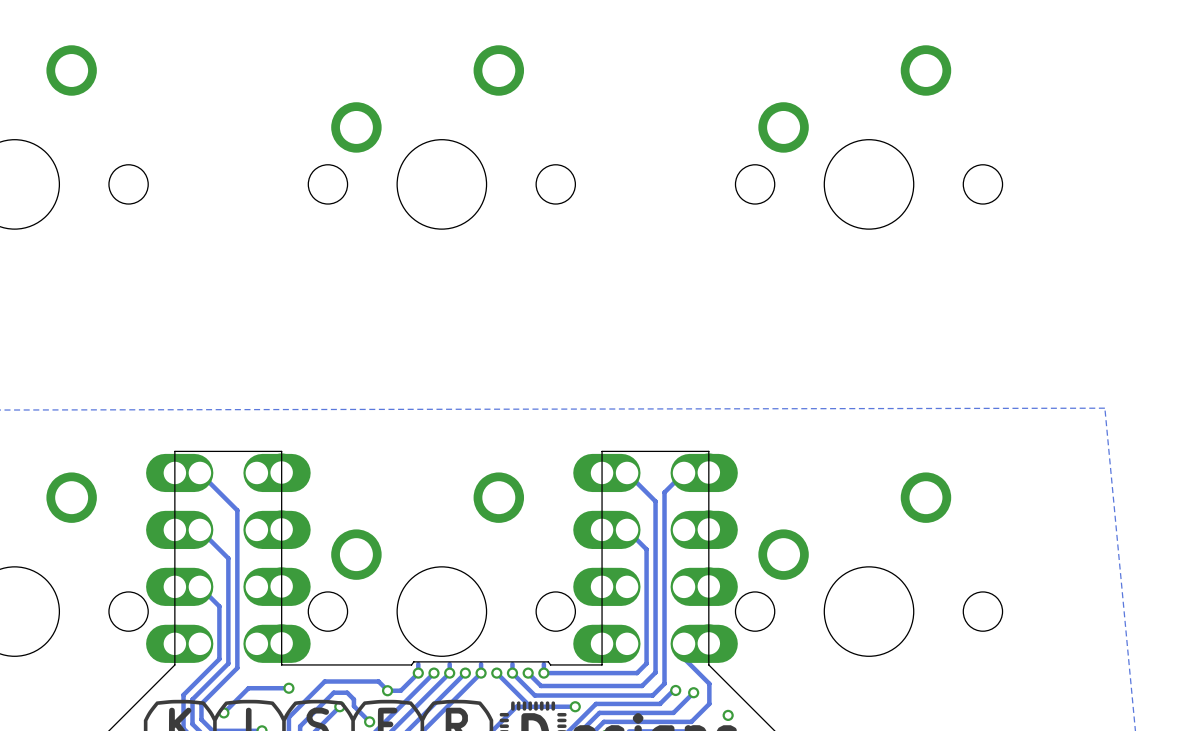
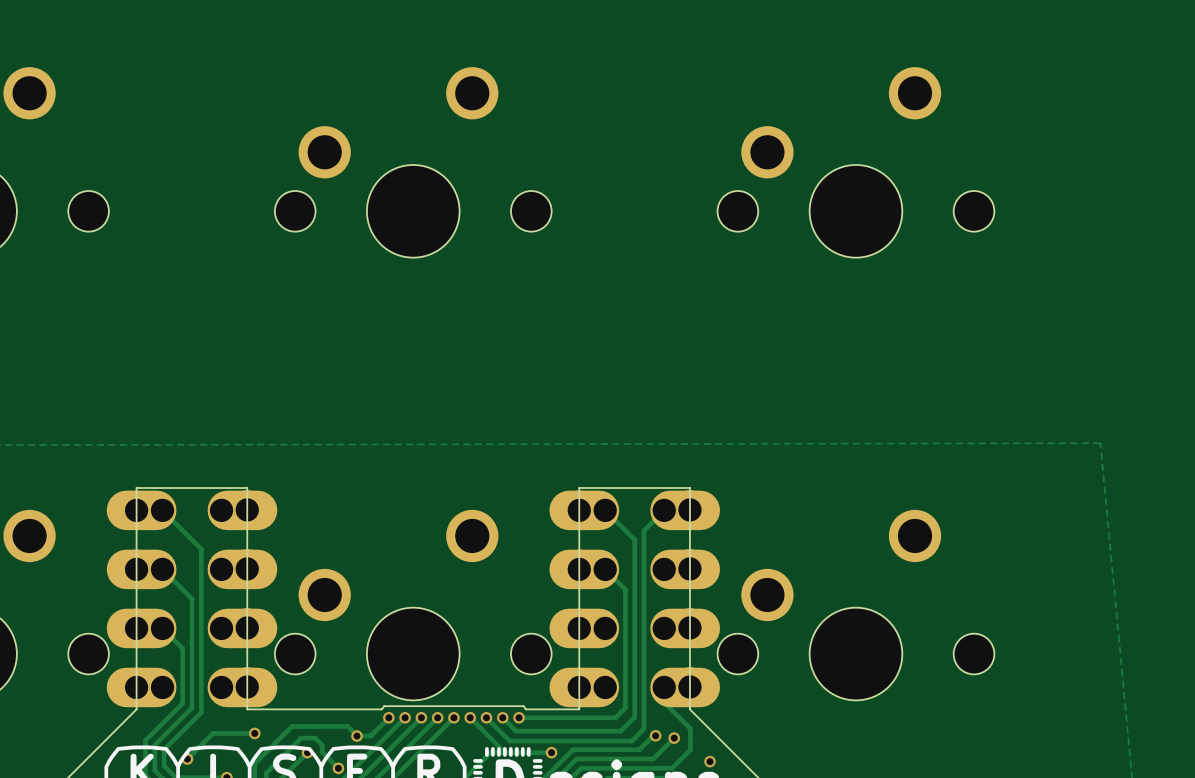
track: (418, 664) (418, 673) -> none
track: (449, 664) (449, 673) -> none
track: (481, 664) (481, 673) -> none
track: (512, 664) (512, 673) -> none
track: (543, 664) (543, 673) -> none

